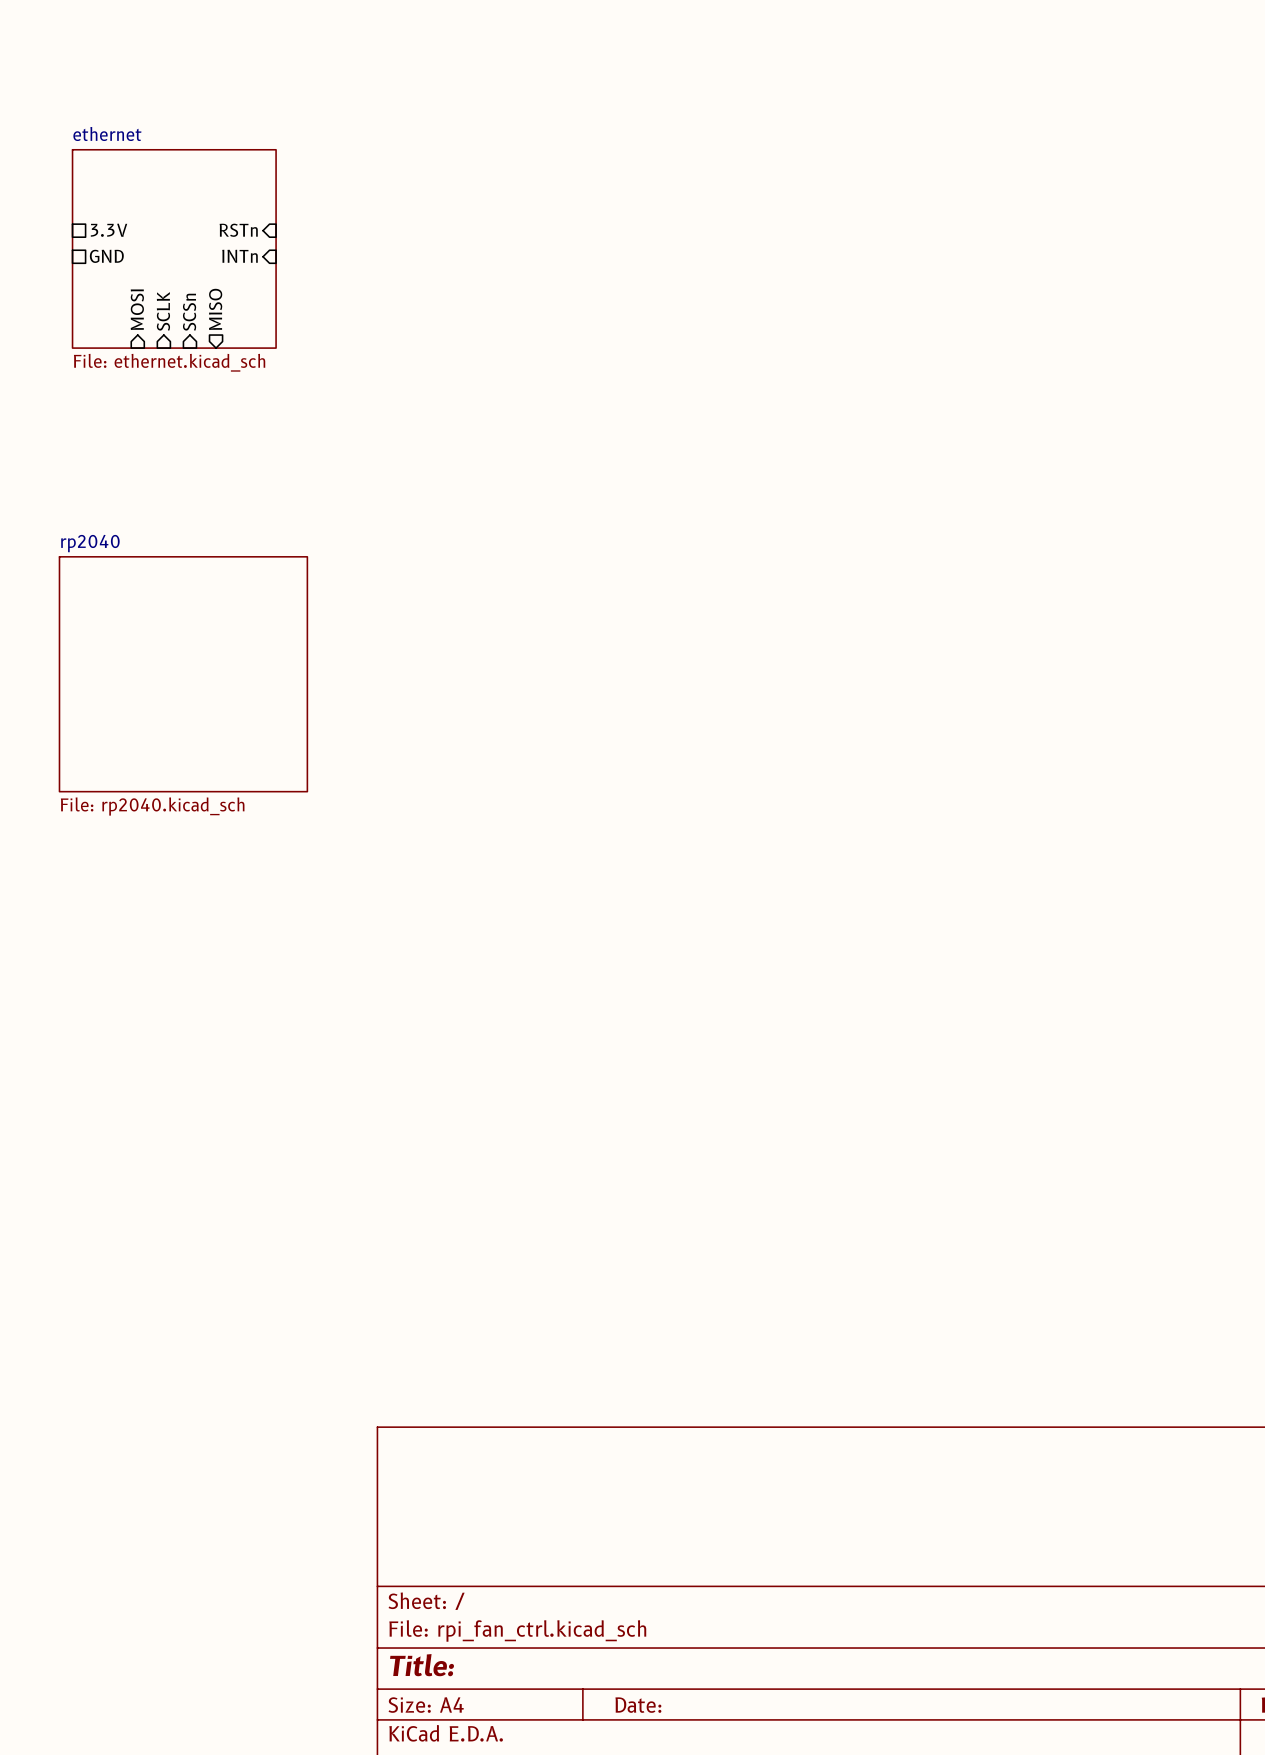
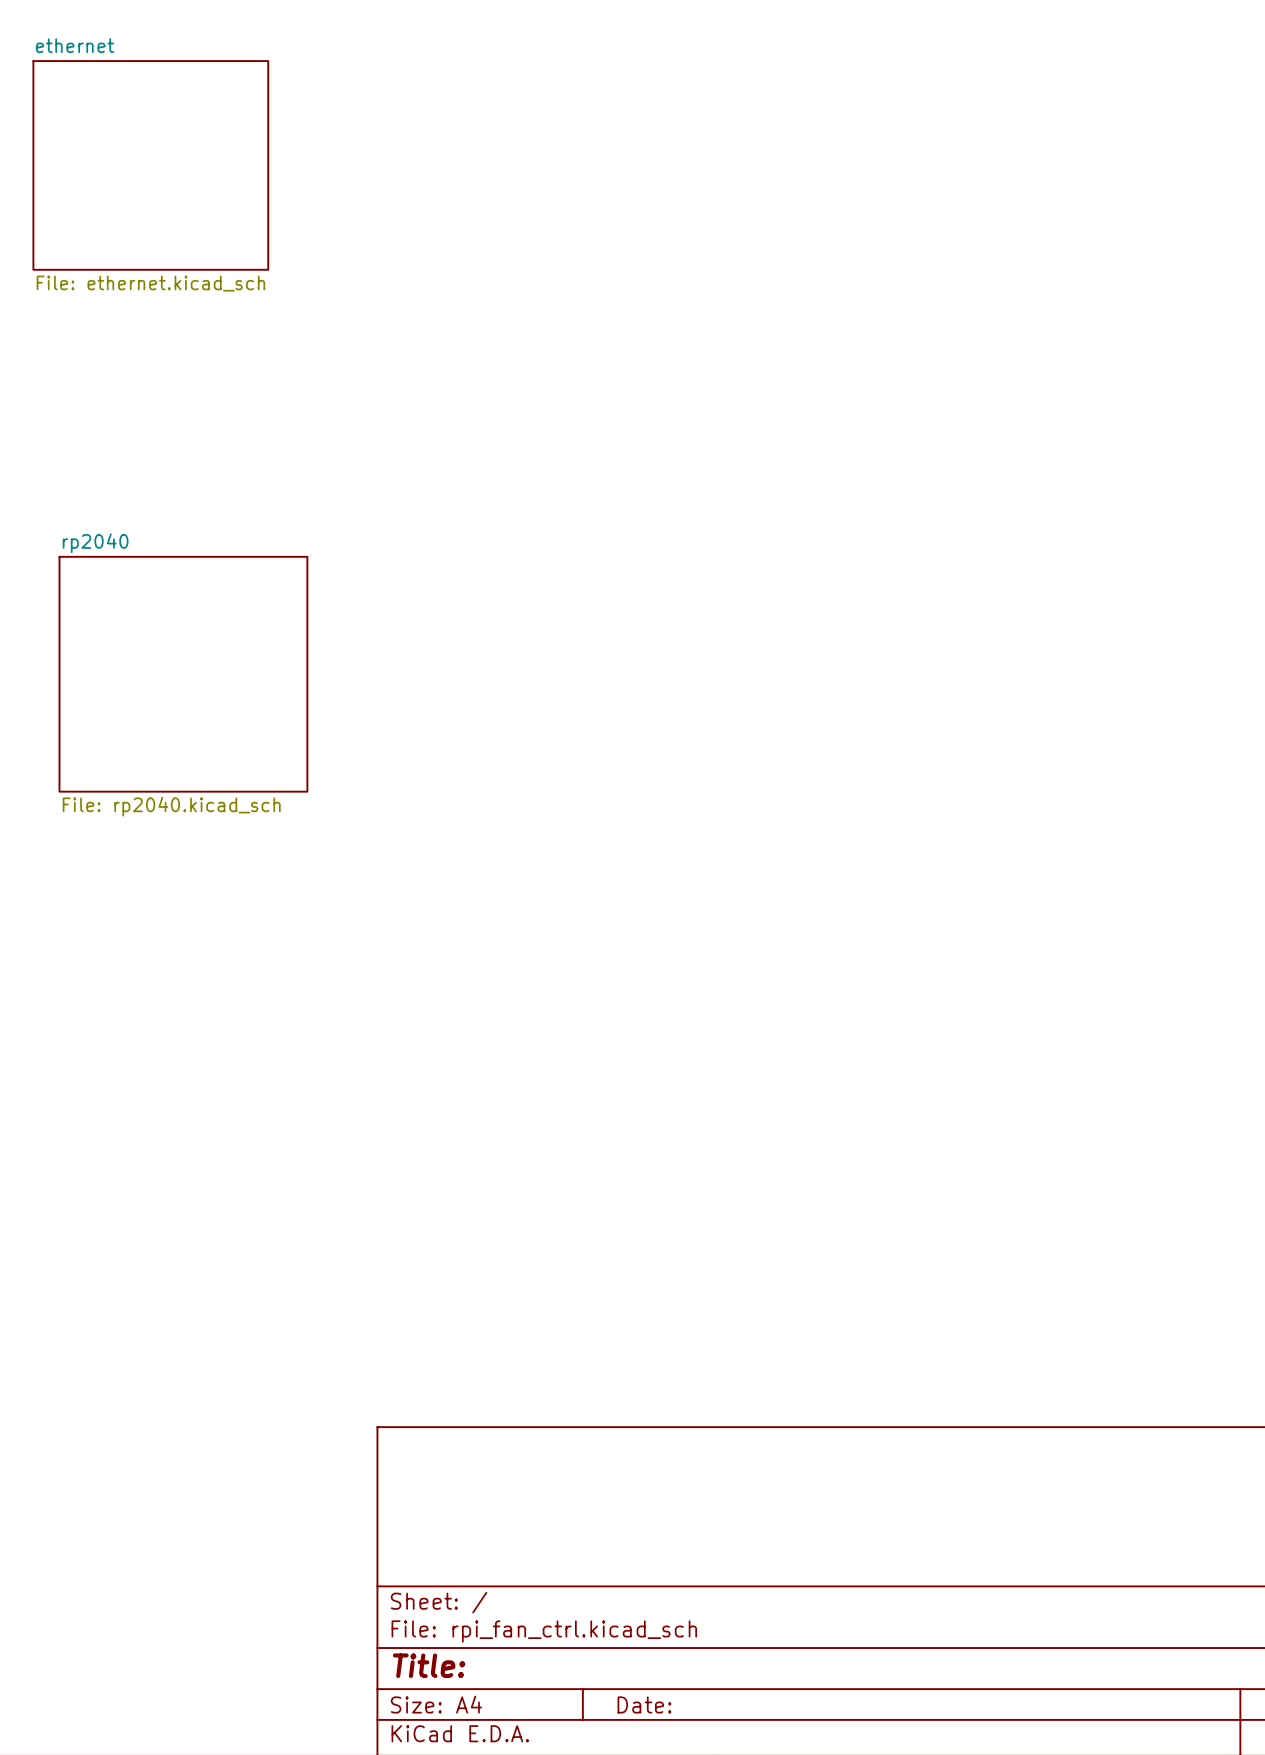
sheet ethernet: none -> File: ethernet.kicad_sch (150, 165)
sheet pin: 3.3V (109, 230) -> none
sheet pin: RSTn (238, 230) -> none
sheet ethernet: File: ethernet.kicad_sch (174, 248) -> none
sheet pin: GND (106, 256) -> none
sheet pin: INTn (240, 256) -> none
sheet pin: MOSI (137, 309) -> none
sheet pin: MISO (215, 309) -> none
sheet pin: SCLK (163, 311) -> none
sheet pin: SCSn (189, 312) -> none

